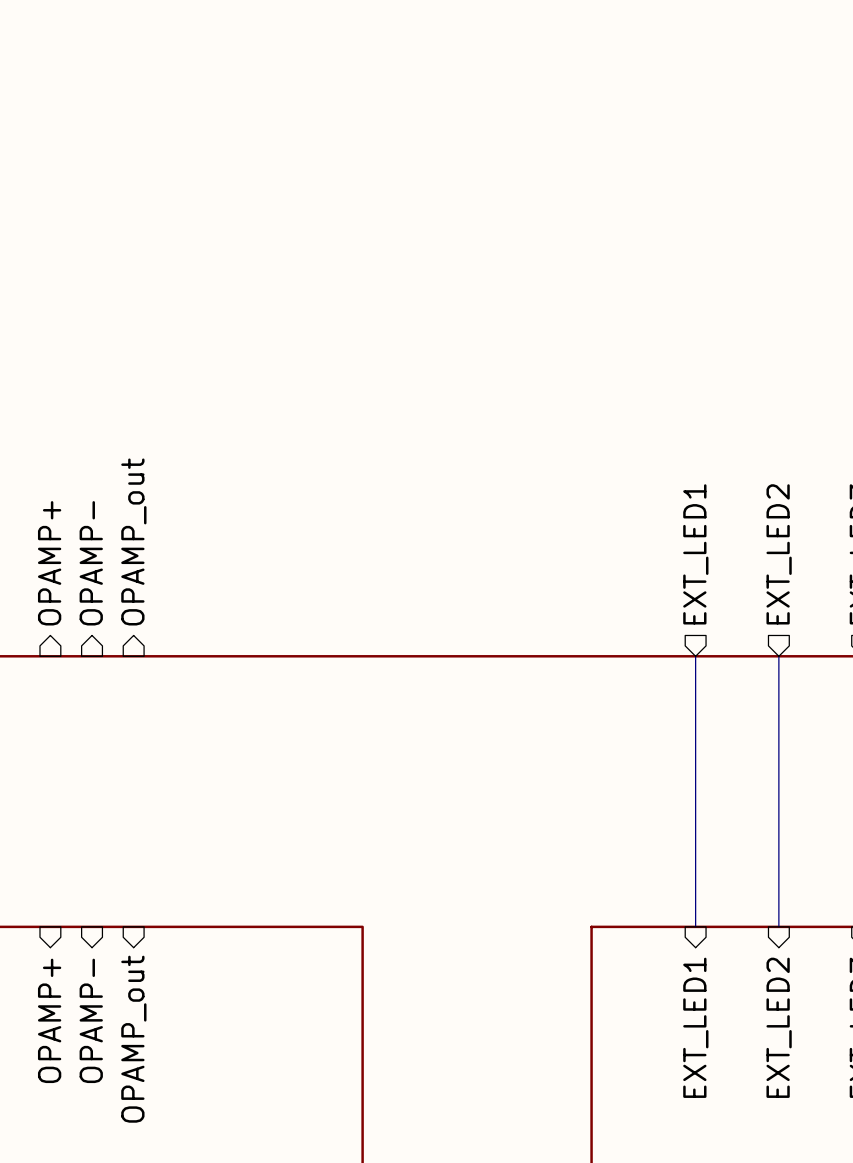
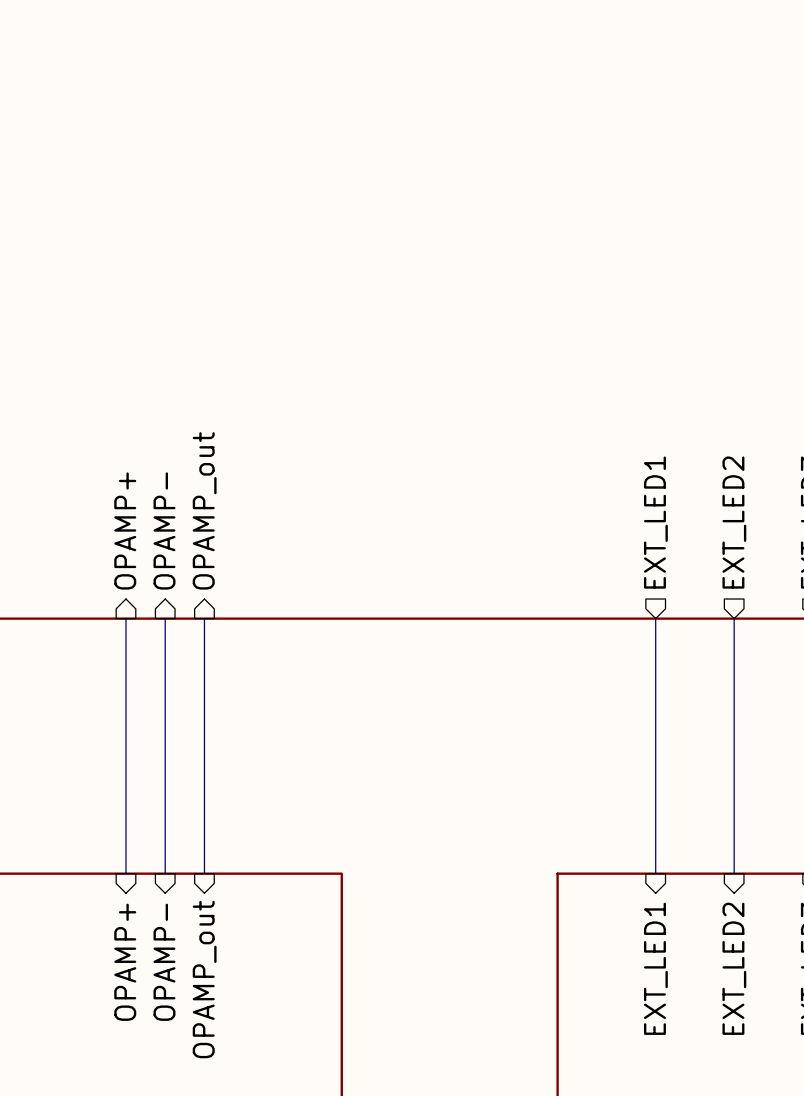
sheet pin: OPAMP_out (133, 541) -> OPAMP+ (125, 530)
sheet pin: none -> OPAMP_out (204, 510)
sheet pin: OPAMP+ (49, 563) -> none
sheet pin position: OPAMP- (91, 563) -> OPAMP- (164, 530)
wire: none -> (125, 618) (125, 873)
wire: none -> (165, 618) (165, 873)
wire: none -> (204, 618) (204, 873)
sheet pin: OPAMP+ (49, 1020) -> none
sheet pin position: OPAMP- (91, 1020) -> OPAMP- (164, 962)
sheet pin: OPAMP_out (133, 1039) -> OPAMP+ (125, 962)
sheet pin: none -> OPAMP_out (204, 979)

